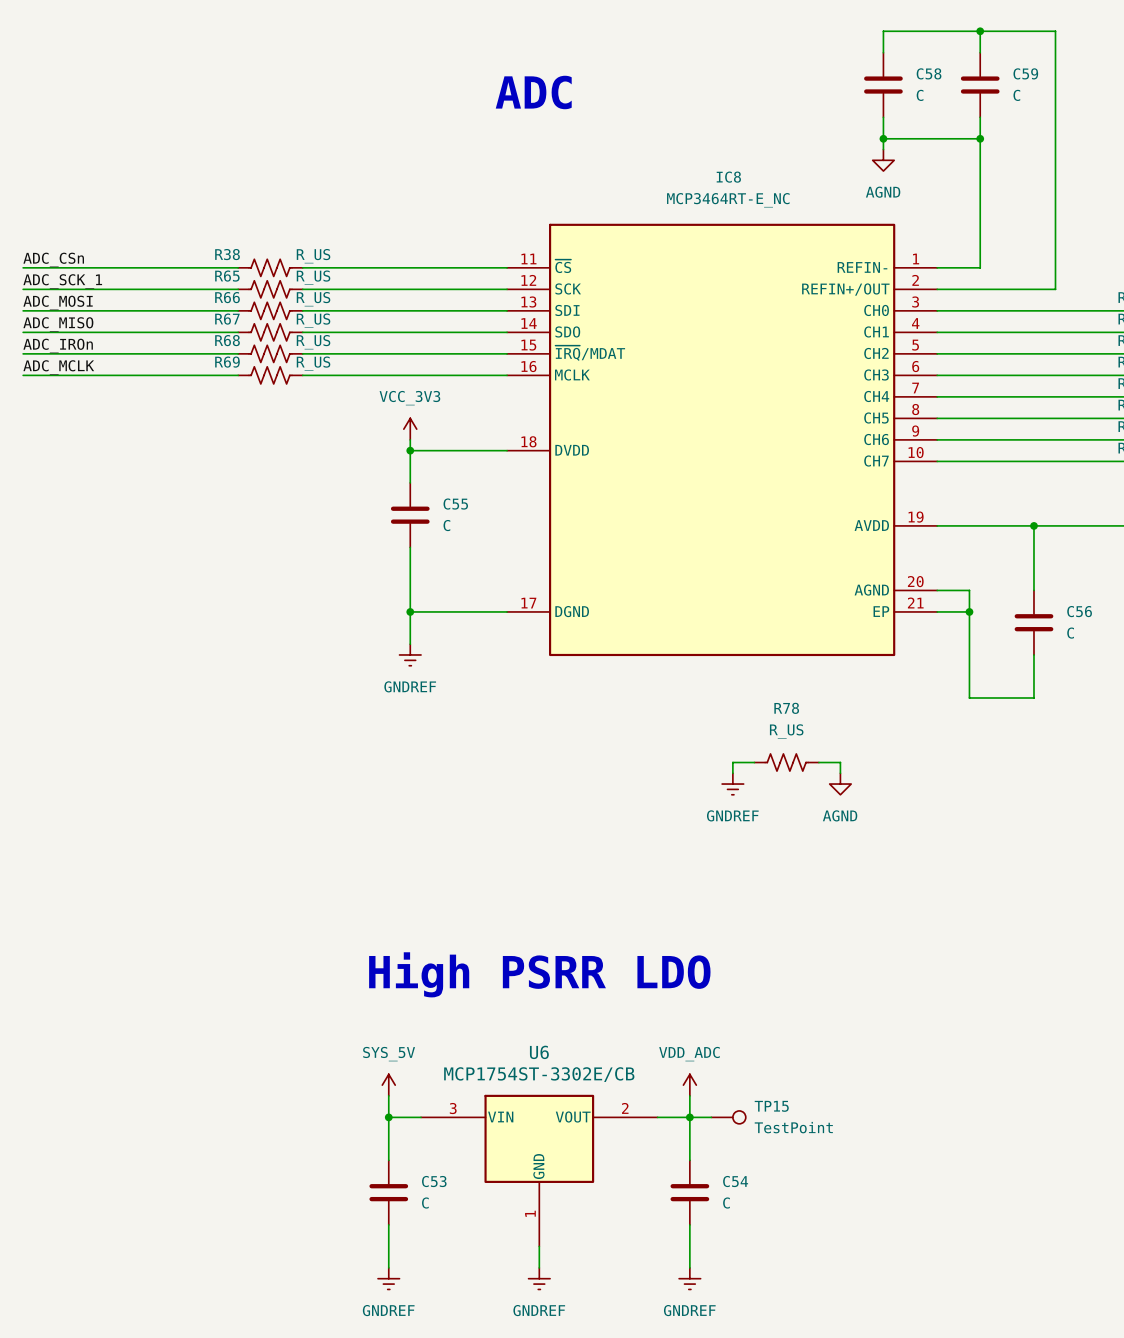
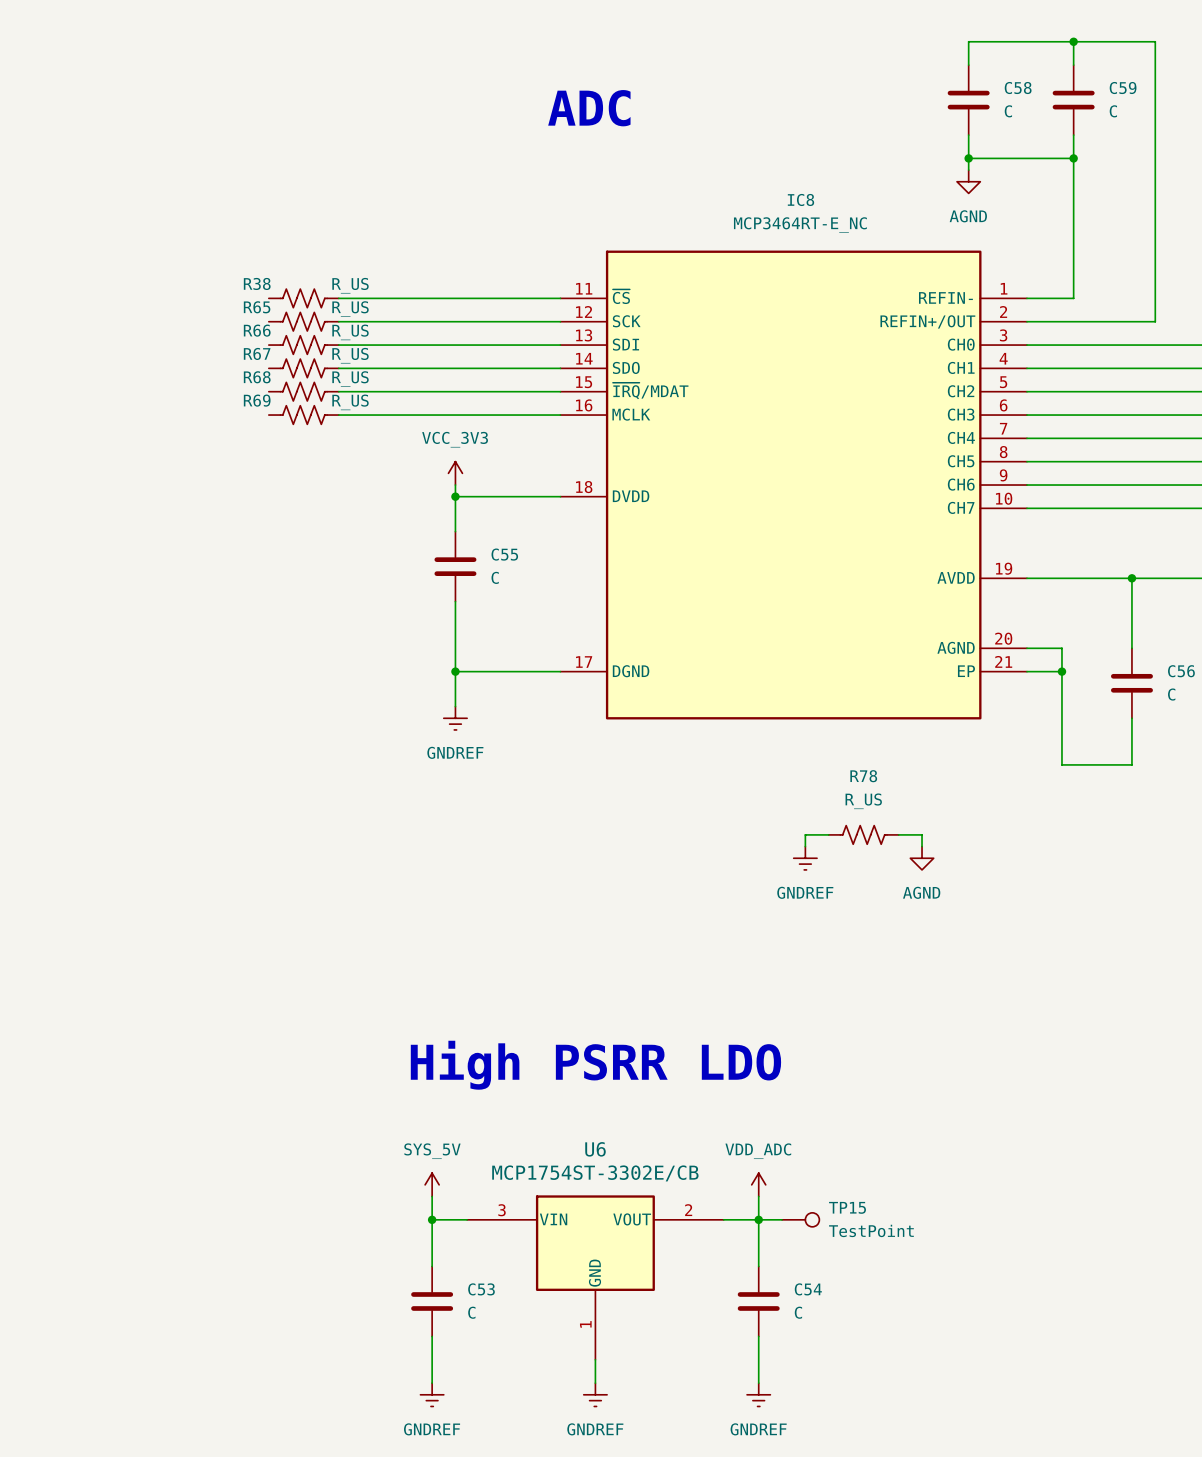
label: ADC_CSn (53, 259) -> none
wire: (23, 267) (238, 267) -> none
label: ADC_SCK_1 (62, 281) -> none
wire: (23, 289) (238, 289) -> none
label: ADC_MOSI (58, 302) -> none
wire: (23, 310) (238, 310) -> none
label: ADC_MISO (58, 324) -> none
wire: (23, 332) (238, 332) -> none
label: ADC_IROn (58, 345) -> none
wire: (23, 353) (238, 353) -> none
label: ADC_MCLK (58, 367) -> none
wire: (23, 375) (238, 375) -> none

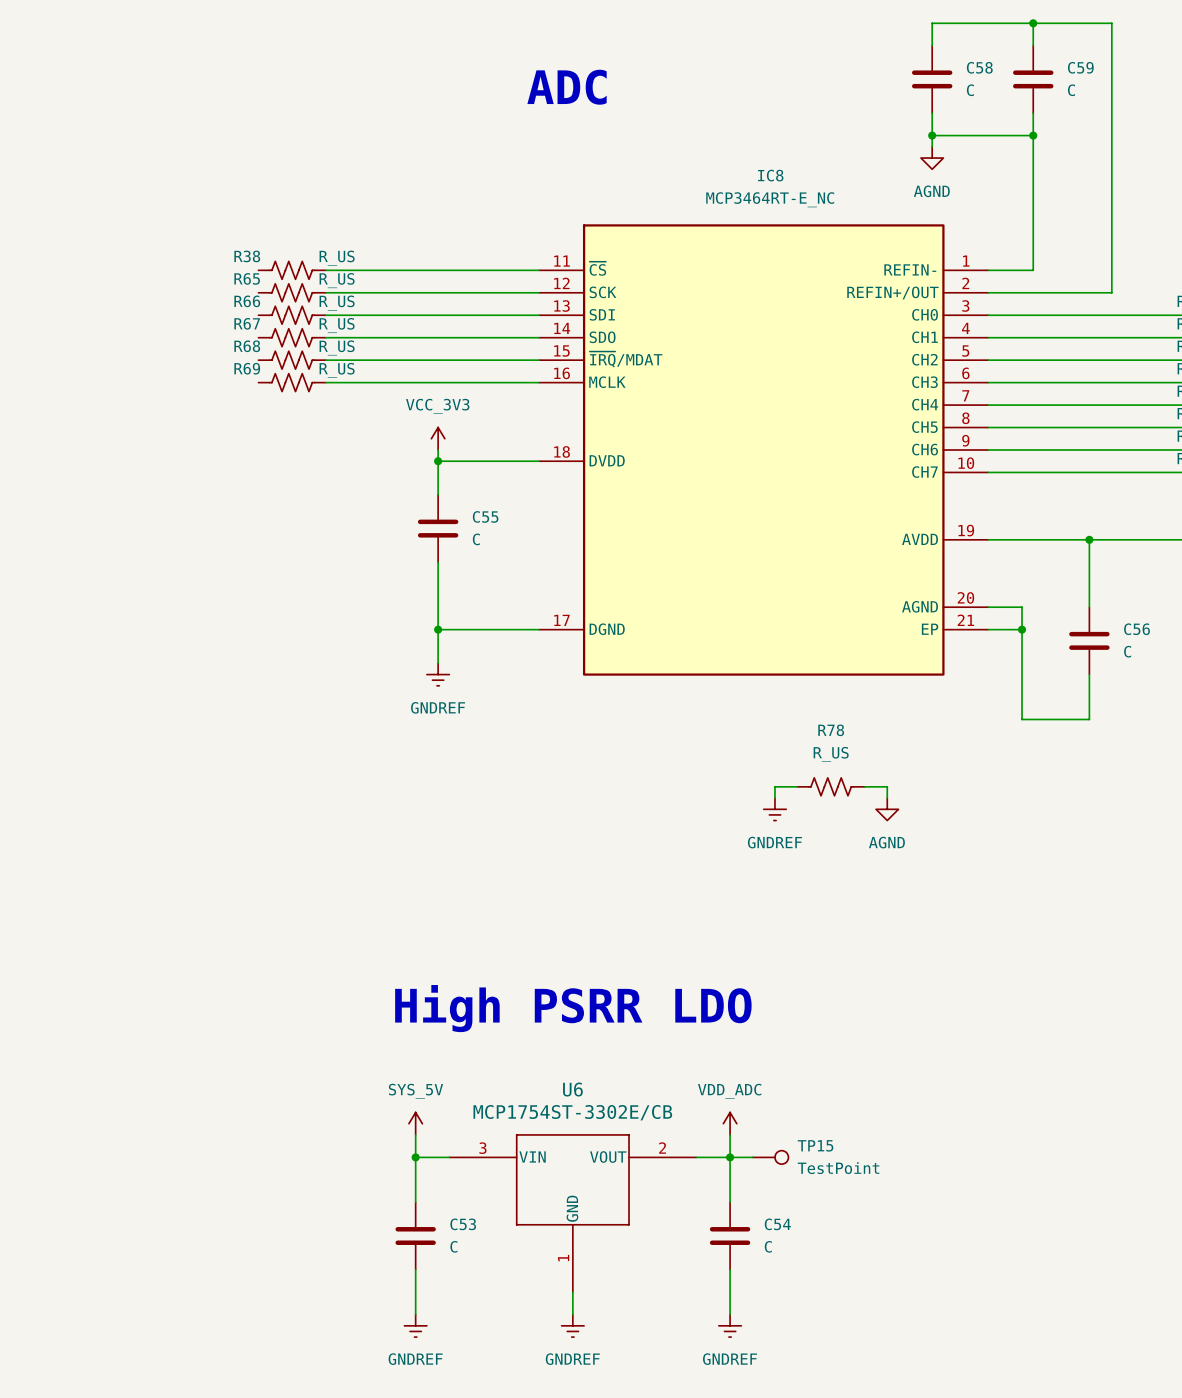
U6 symbol: [467, 1195, 724, 1360] -> [449, 1134, 697, 1293]

